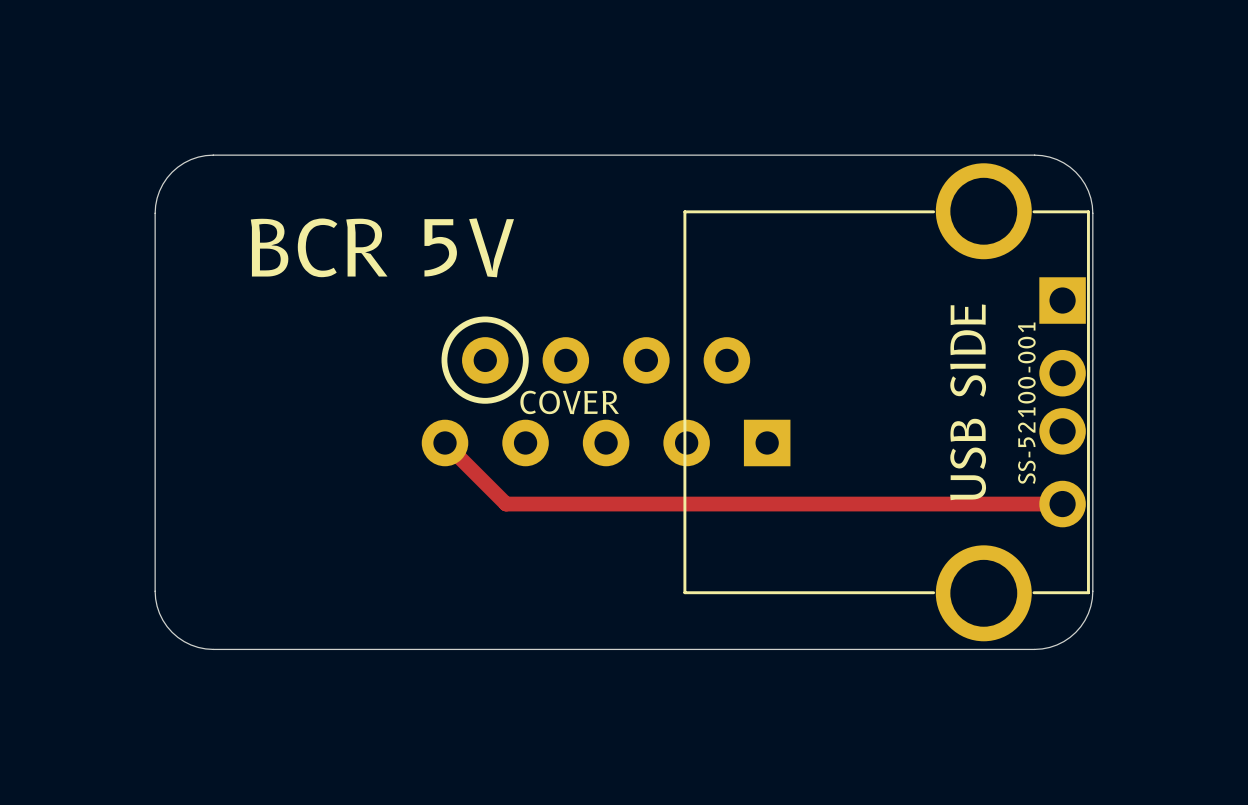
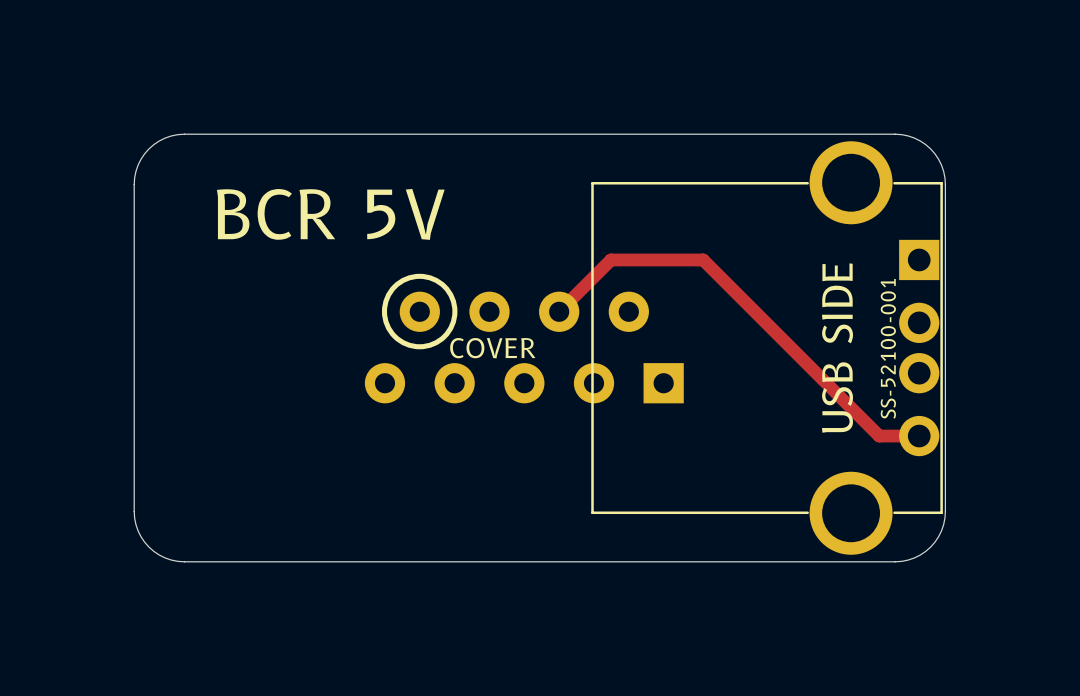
track: (445, 442) (506, 504) (1016, 504) -> (559, 311) (610, 259) (703, 259) (879, 436)

